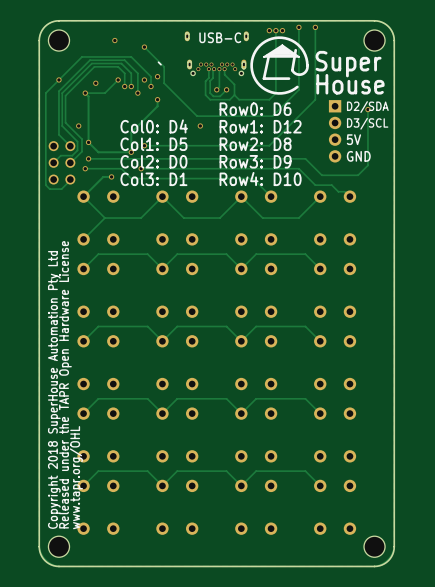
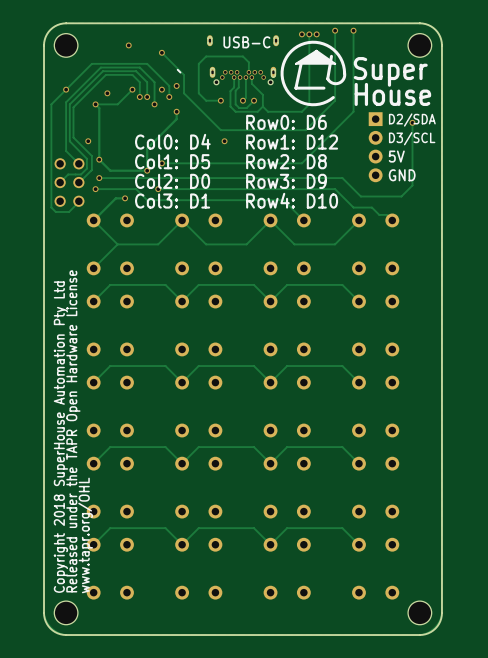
track: none -> (248, 72) (248, 62) (242, 56) (206, 56) (198, 63) (198, 93) (206, 100) (220, 100)
via: none -> (220, 100)

